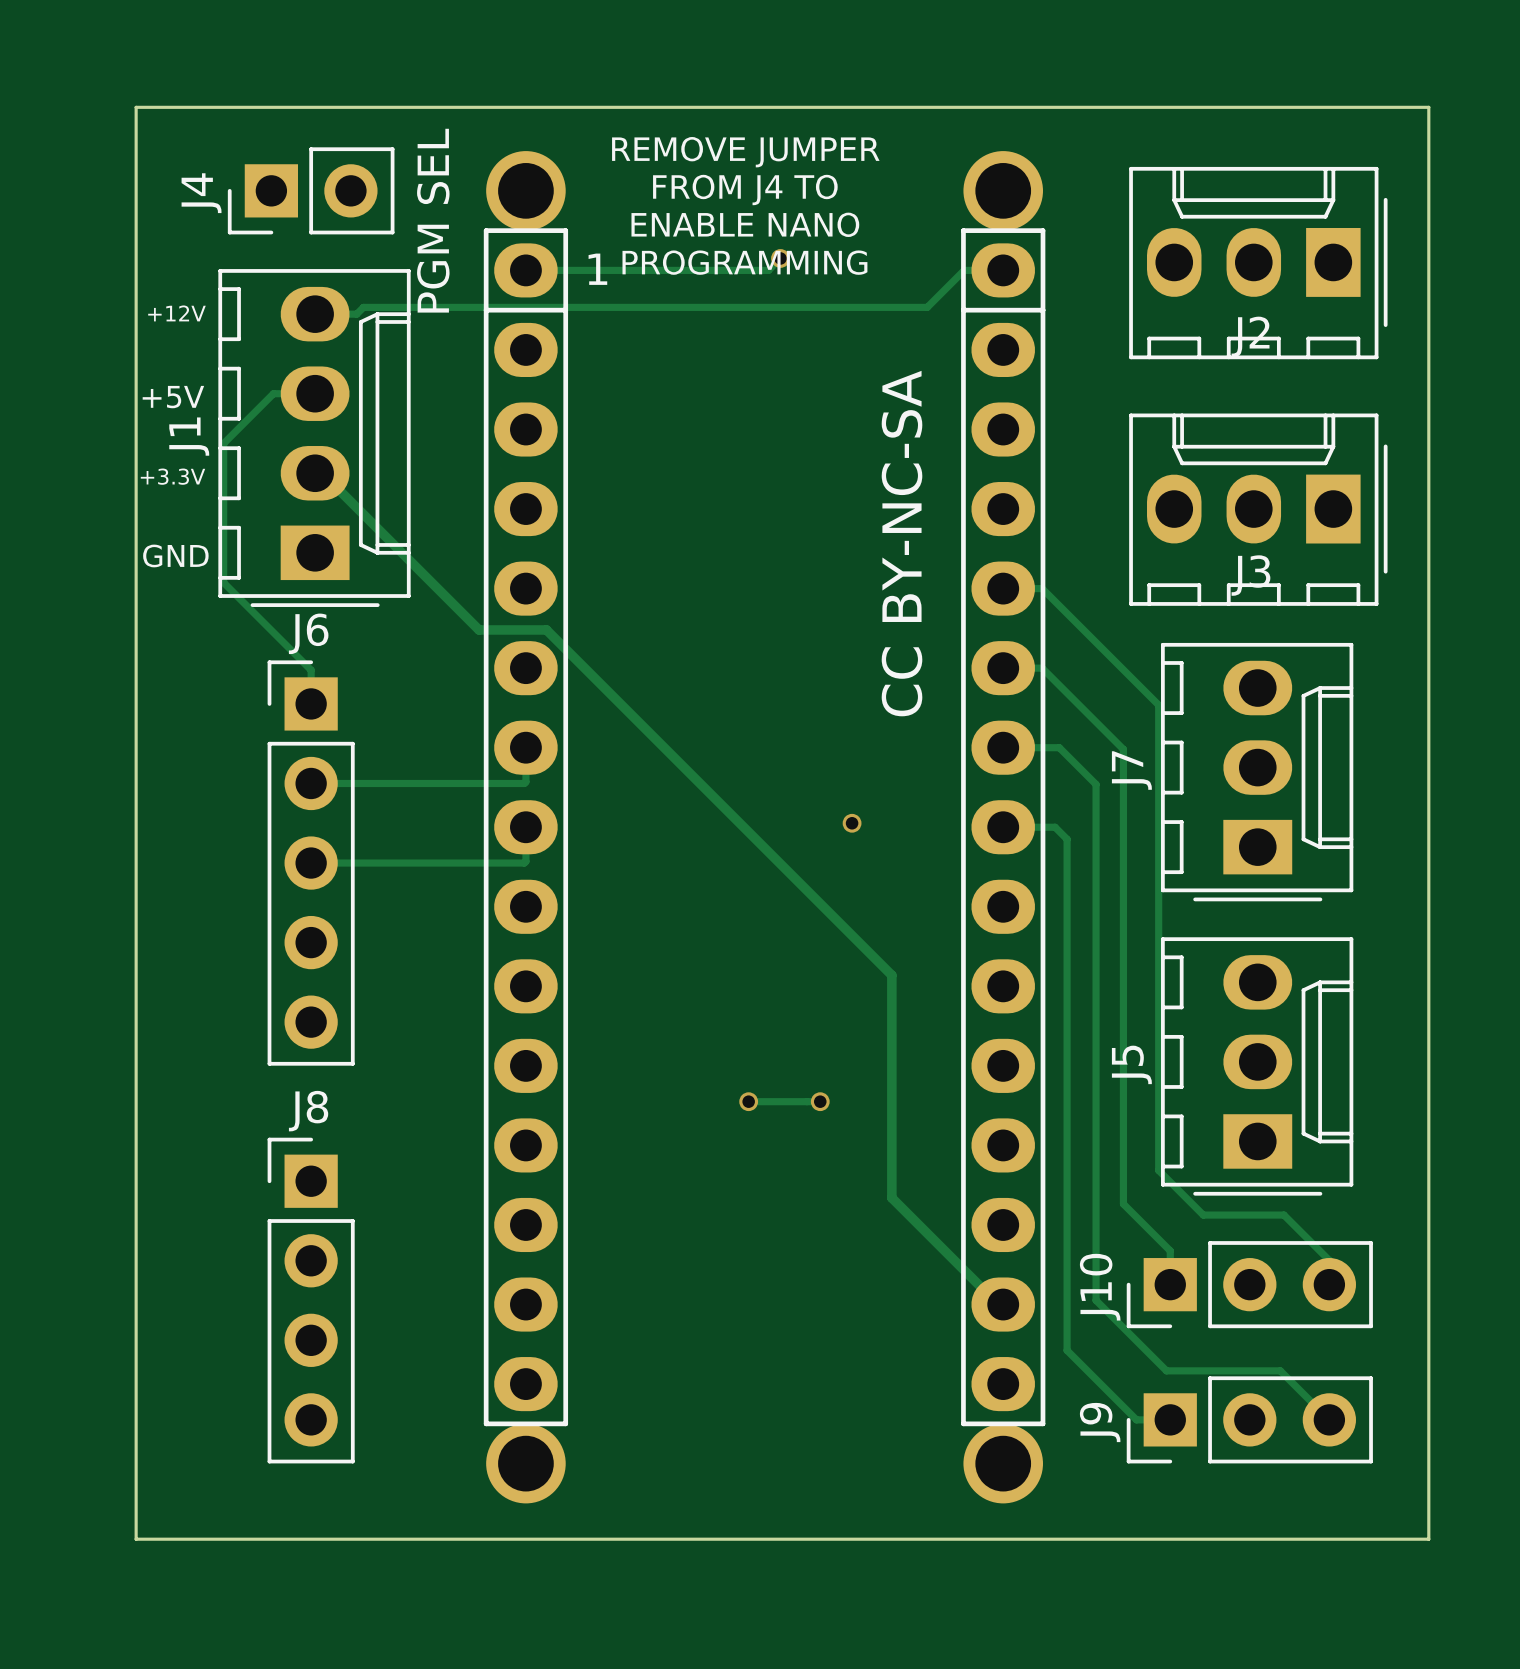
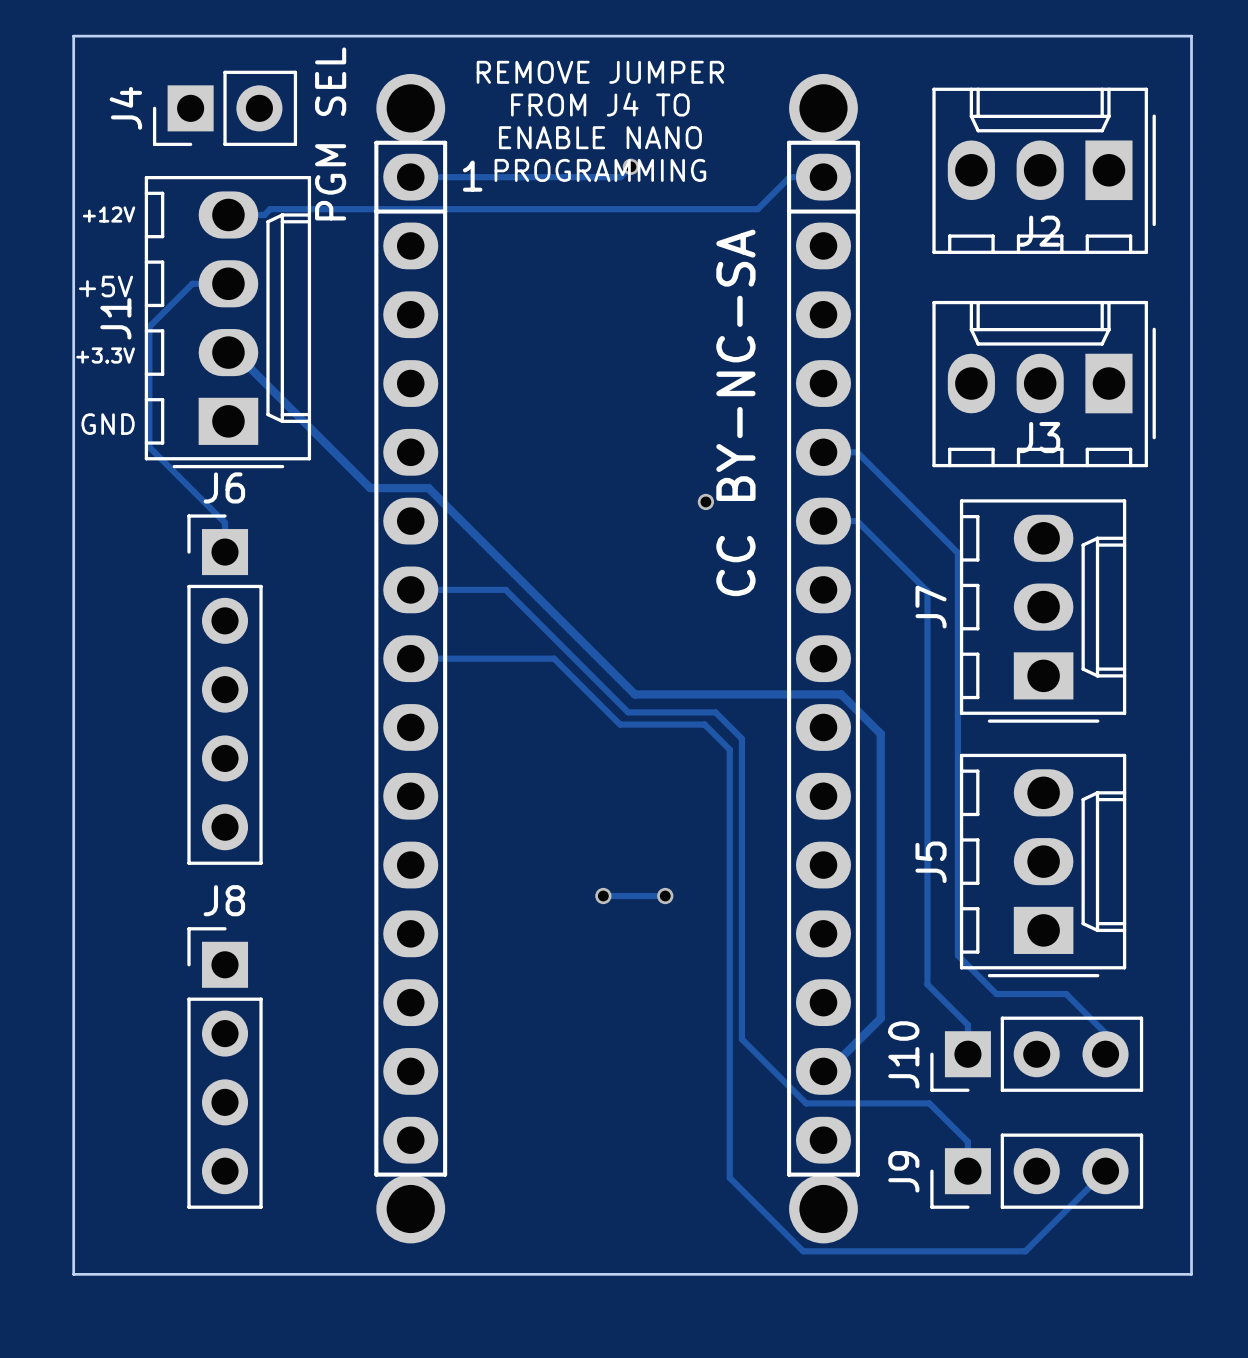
track: (525, 747) (525, 781) (524, 783) (311, 783) -> none
track: (1007, 747) (1059, 747) (1096, 784) (1096, 1300) (1166, 1370) (1280, 1370) (1329, 1419) -> (410, 658) (554, 658) (620, 724) (704, 724) (729, 749) (729, 1177) (803, 1251) (1025, 1251) (1105, 1171)
via position: (852, 823) -> (705, 501)
track: (525, 827) (525, 861) (524, 863) (311, 863) -> none
track: (1007, 827) (1055, 827) (1067, 839) (1067, 1350) (1136, 1419) (1170, 1419) -> (410, 589) (505, 589) (628, 712) (715, 712) (741, 738) (741, 1039) (806, 1103) (929, 1103) (967, 1141) (967, 1171)
track: (785, 868) (891, 975) (891, 1197) (998, 1304) (1003, 1304) -> (634, 694) (841, 694) (880, 733) (880, 1018) (827, 1071) (823, 1071)

